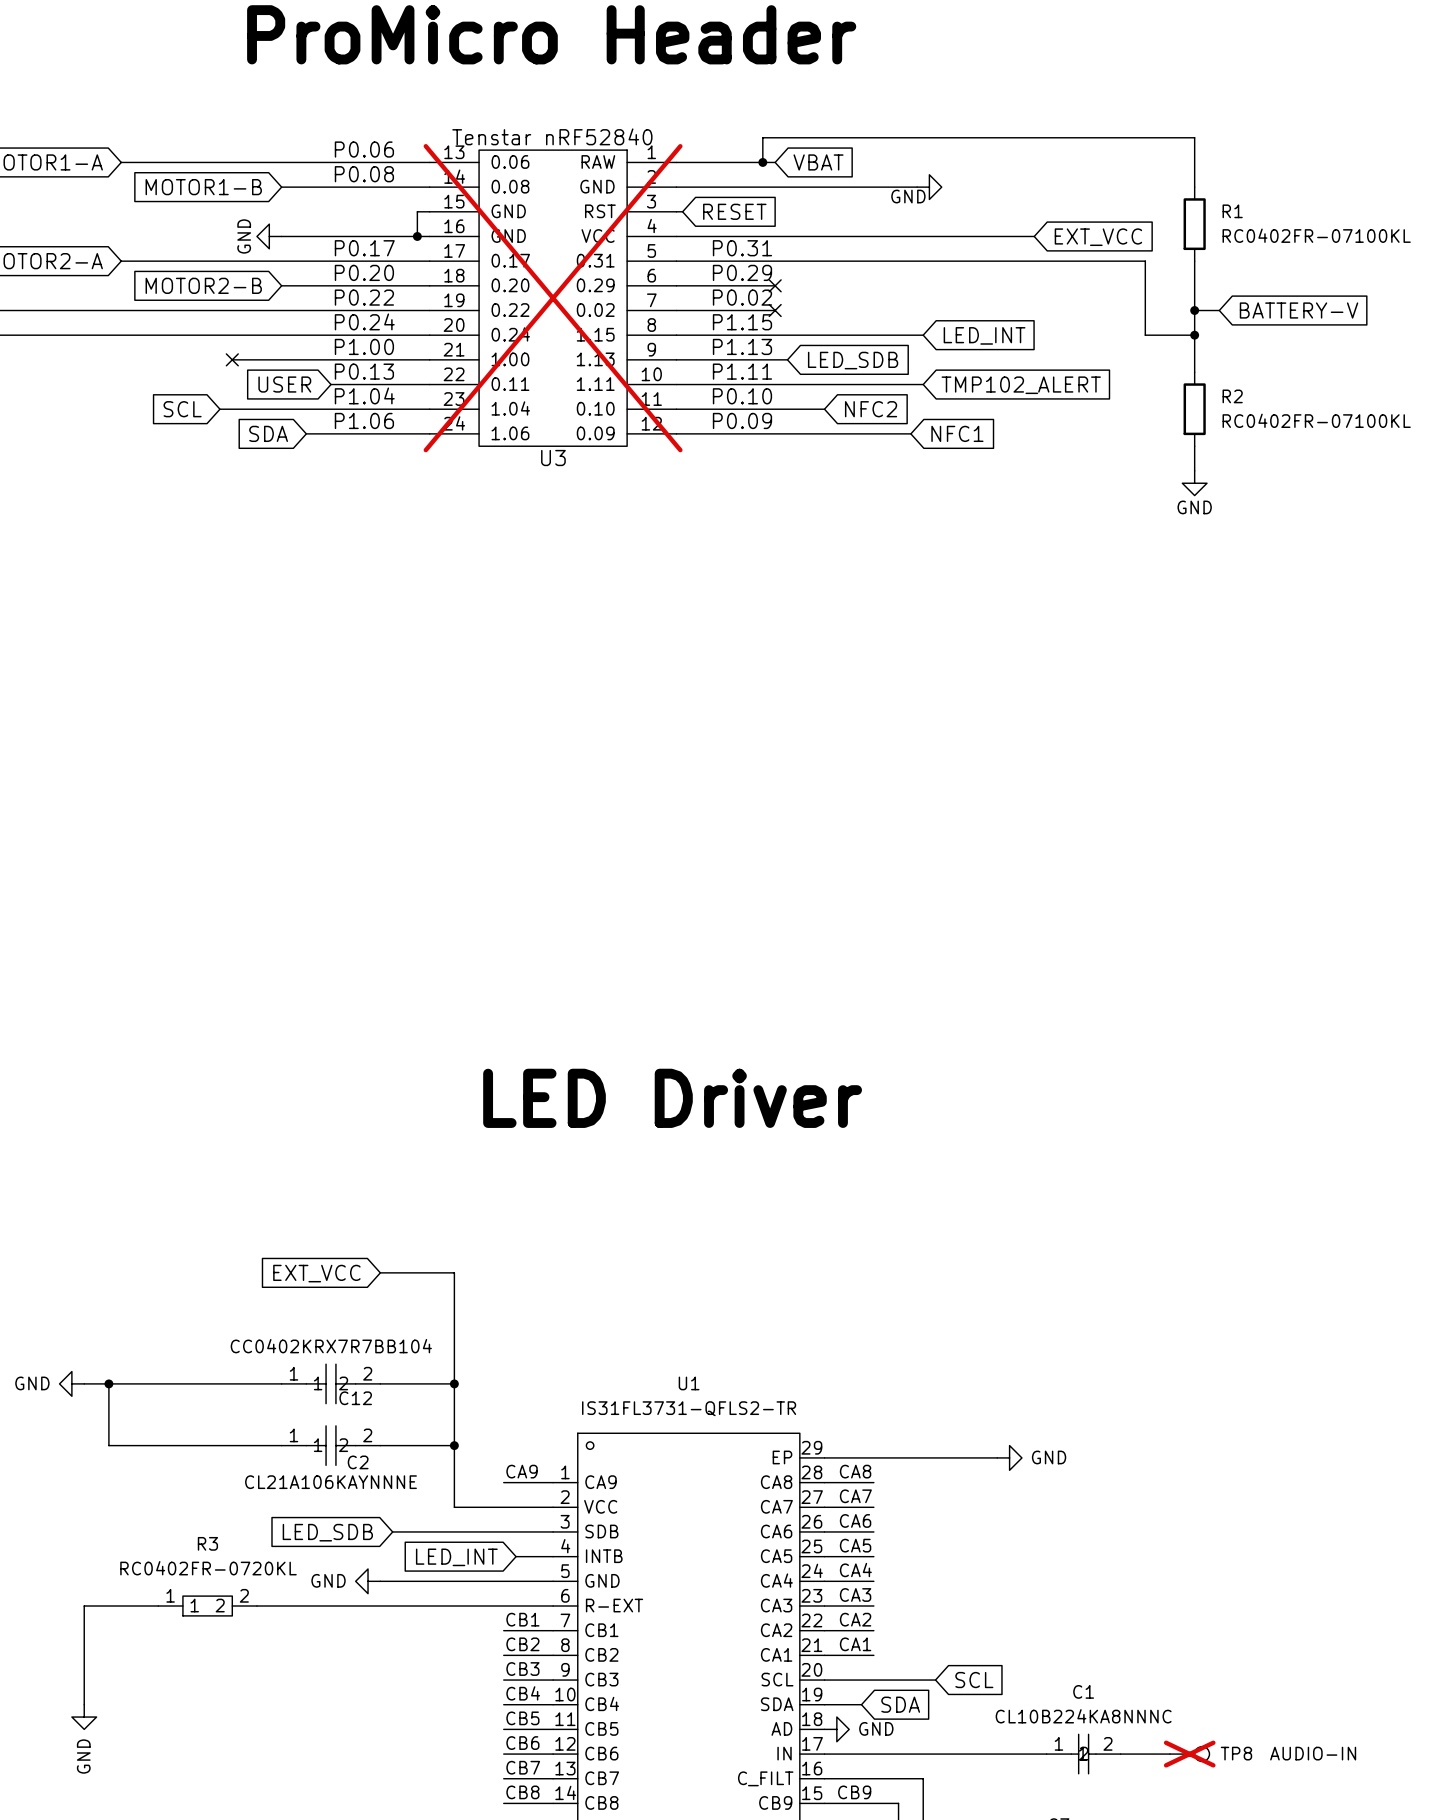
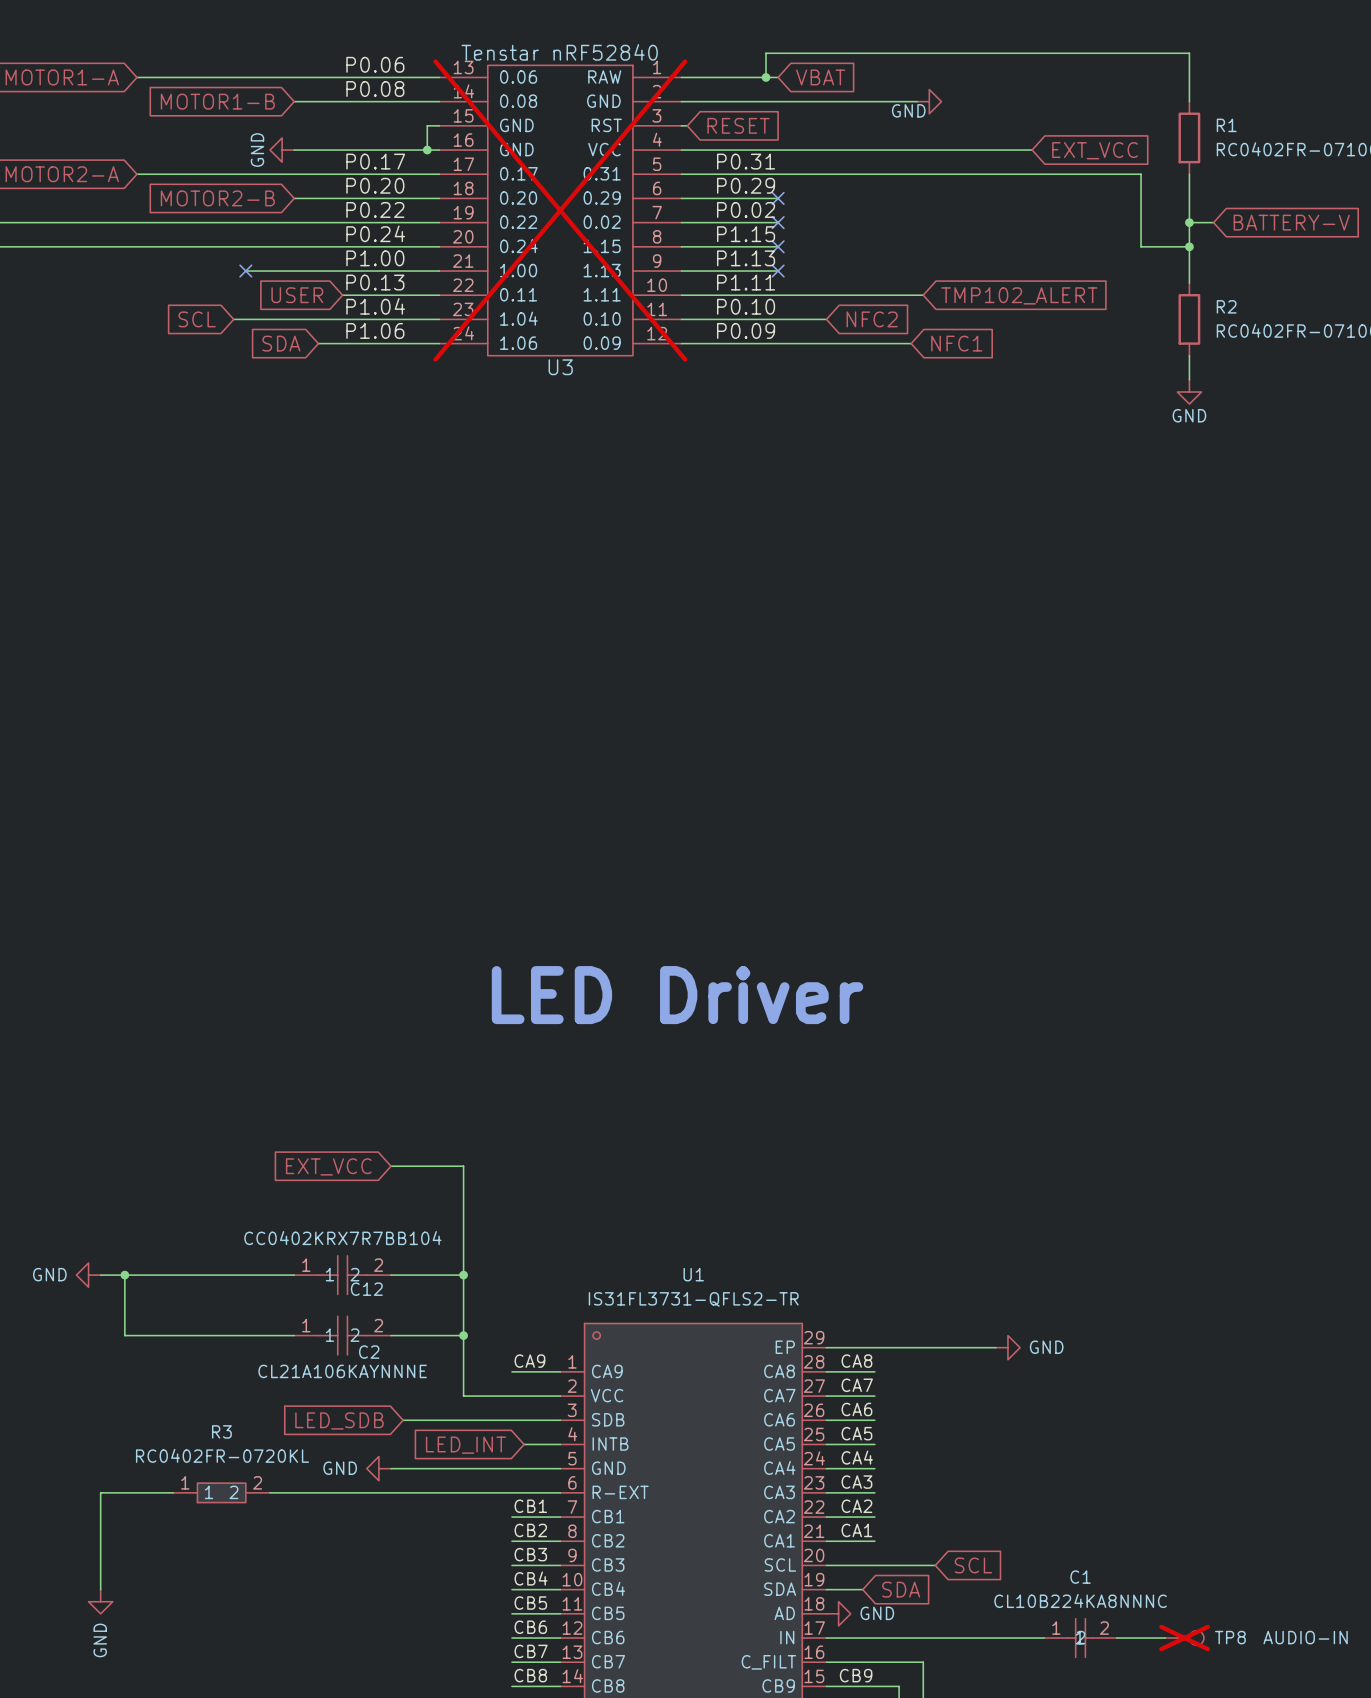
wire: (775, 335) (923, 335) -> none
no-connect mark: none -> (778, 246)
global label: LED_INT (984, 335) -> none
wire: (775, 359) (787, 359) -> none
no-connect mark: none -> (778, 271)
global label: LED_SDB (853, 360) -> none

